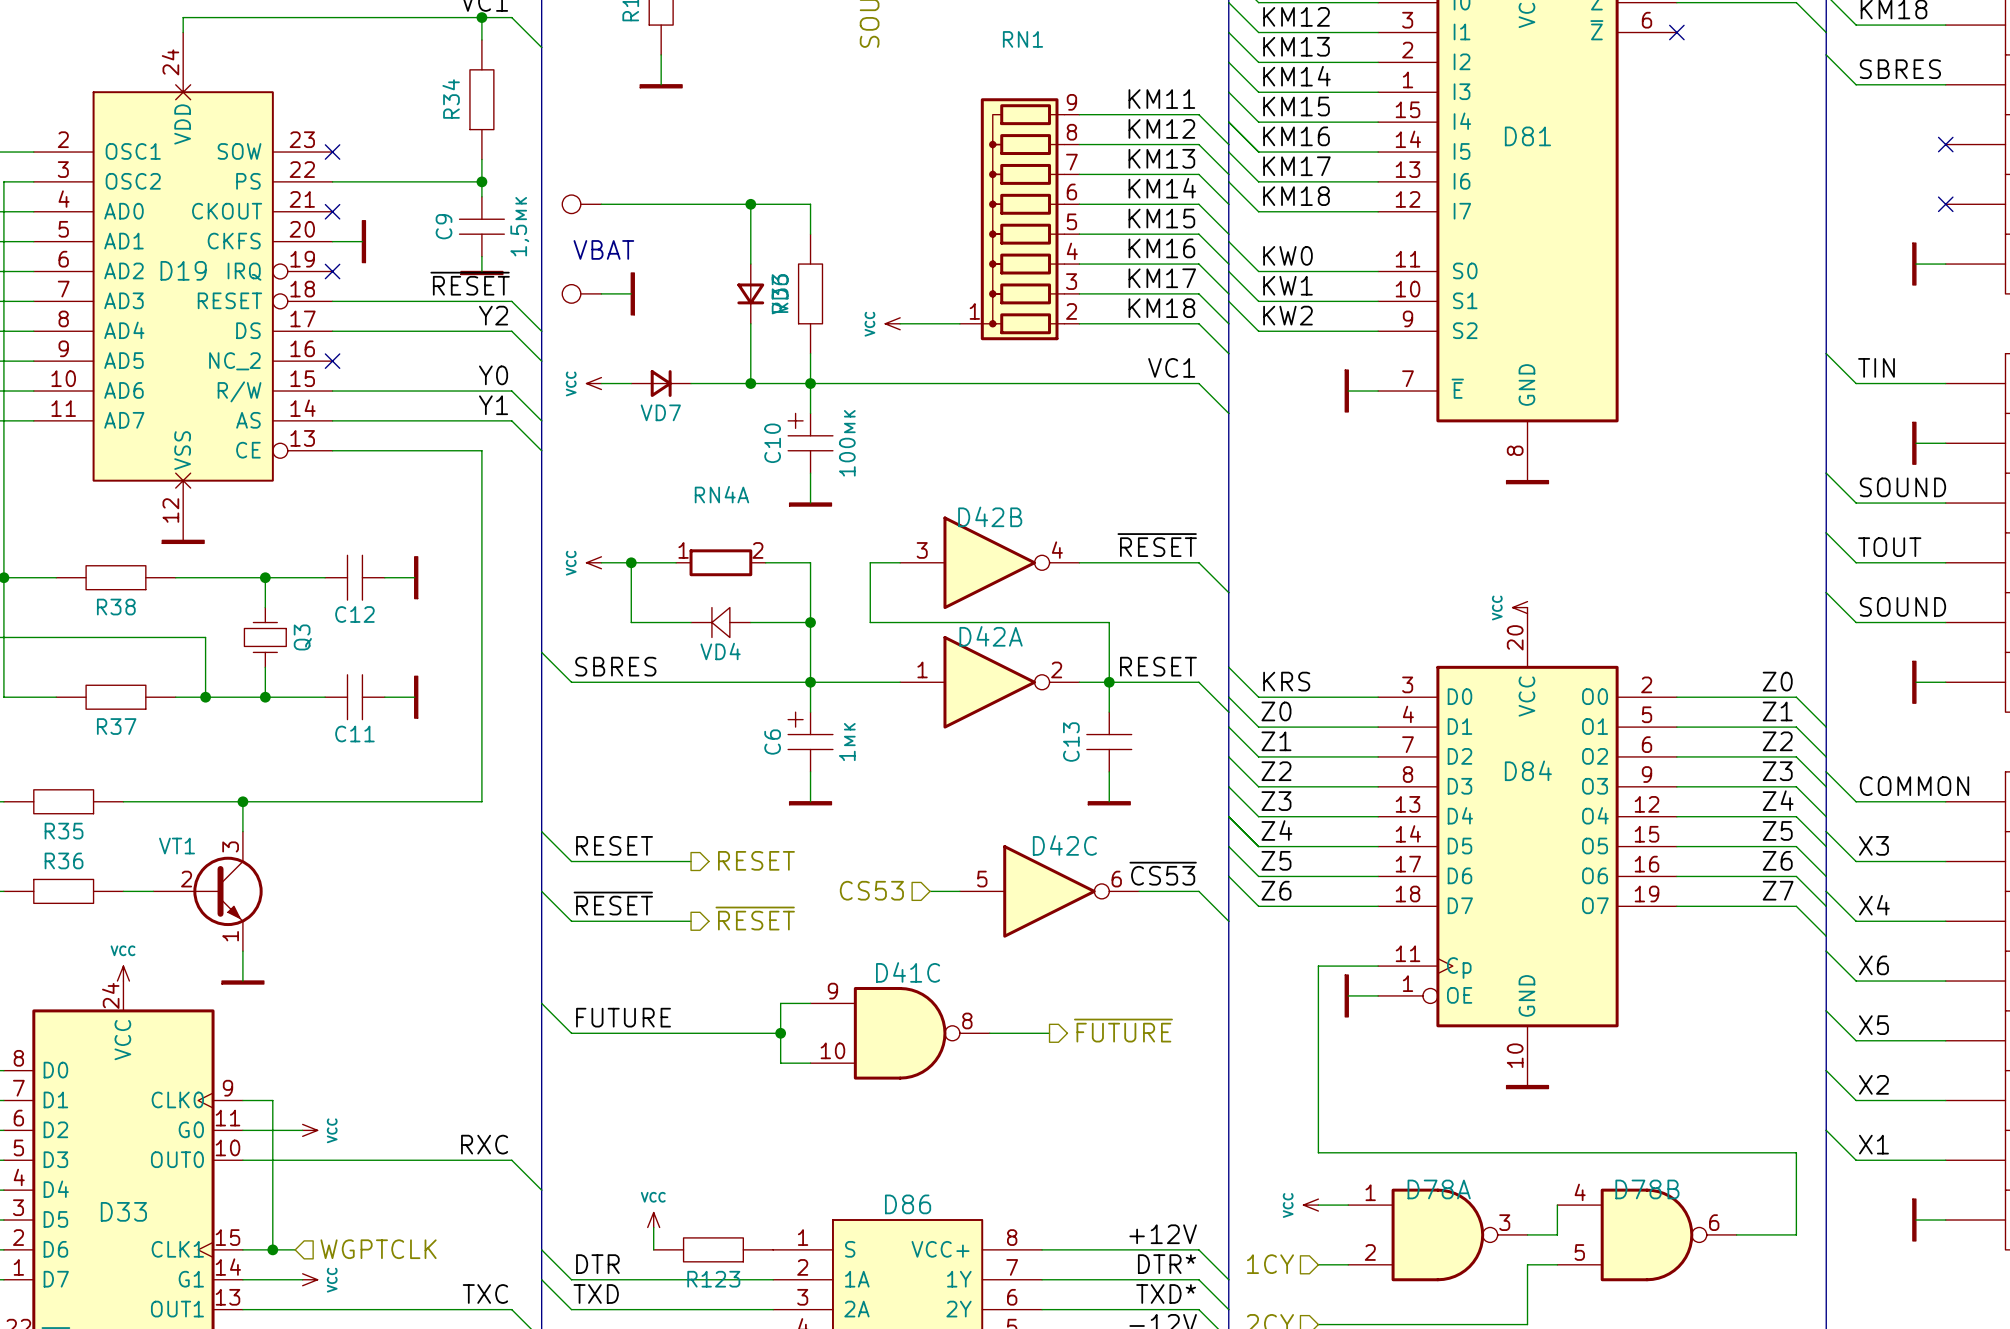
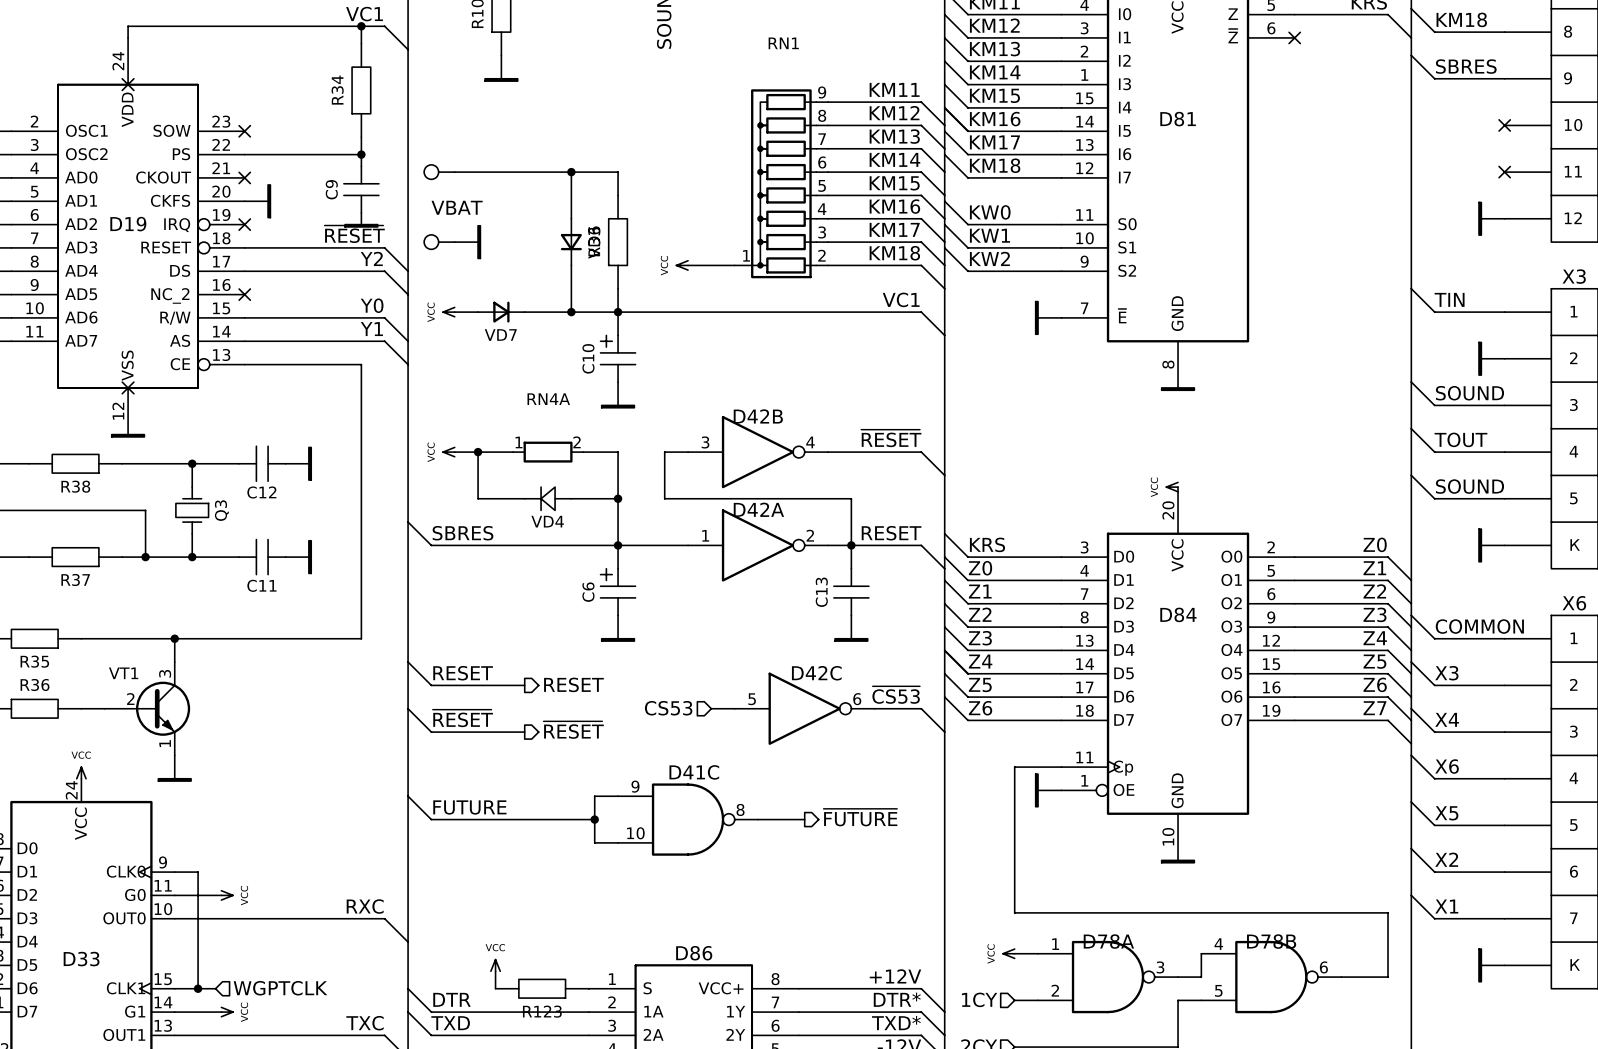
C9 value: 1,5мк (519, 226) -> none
C10 value: 100мк (847, 443) -> none
C6 value: 1мк (847, 742) -> none

